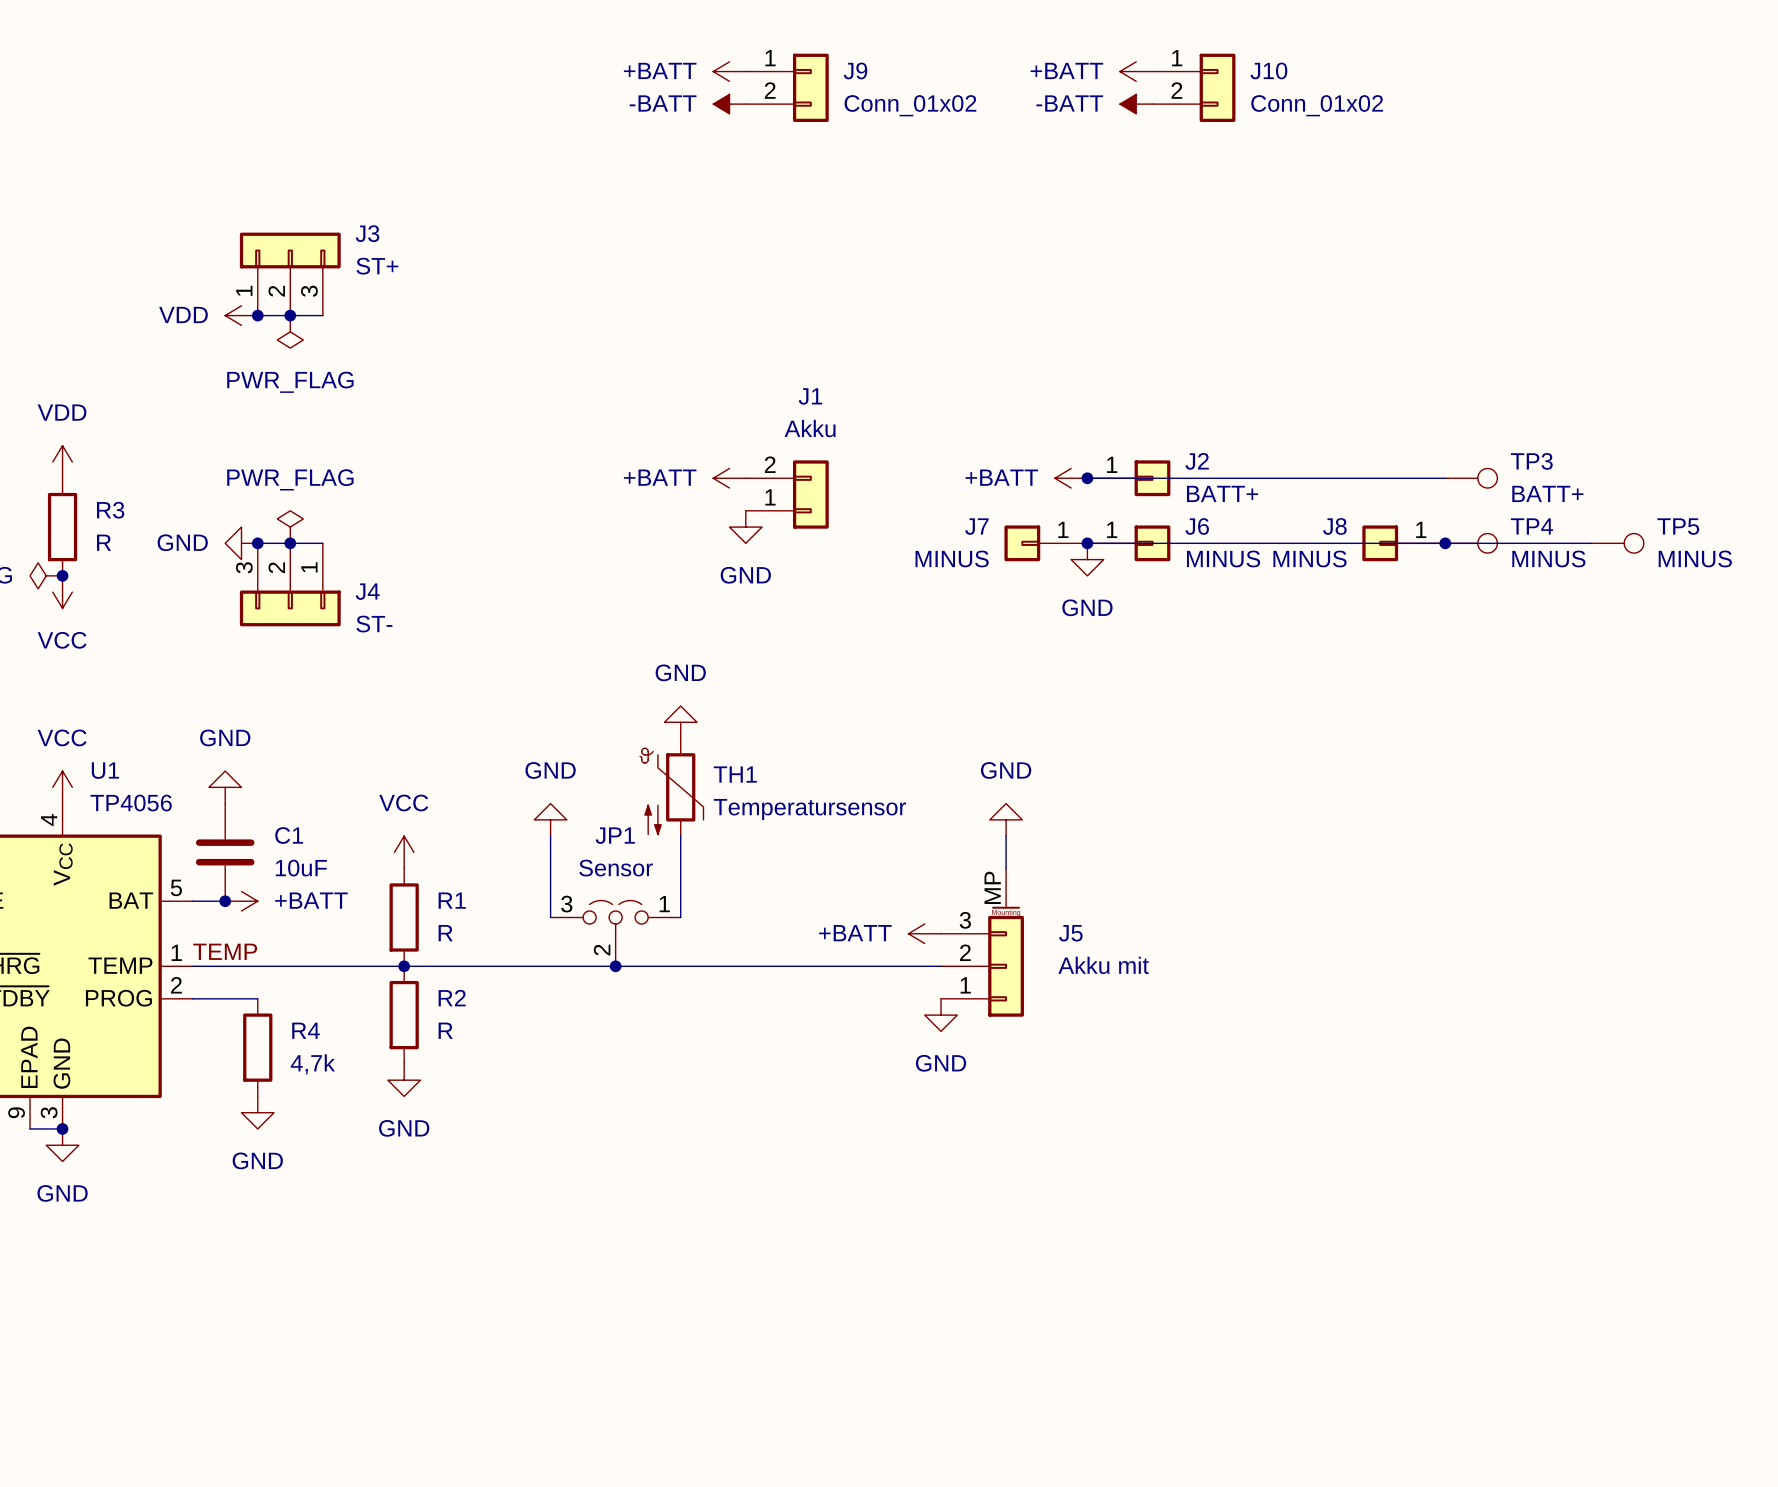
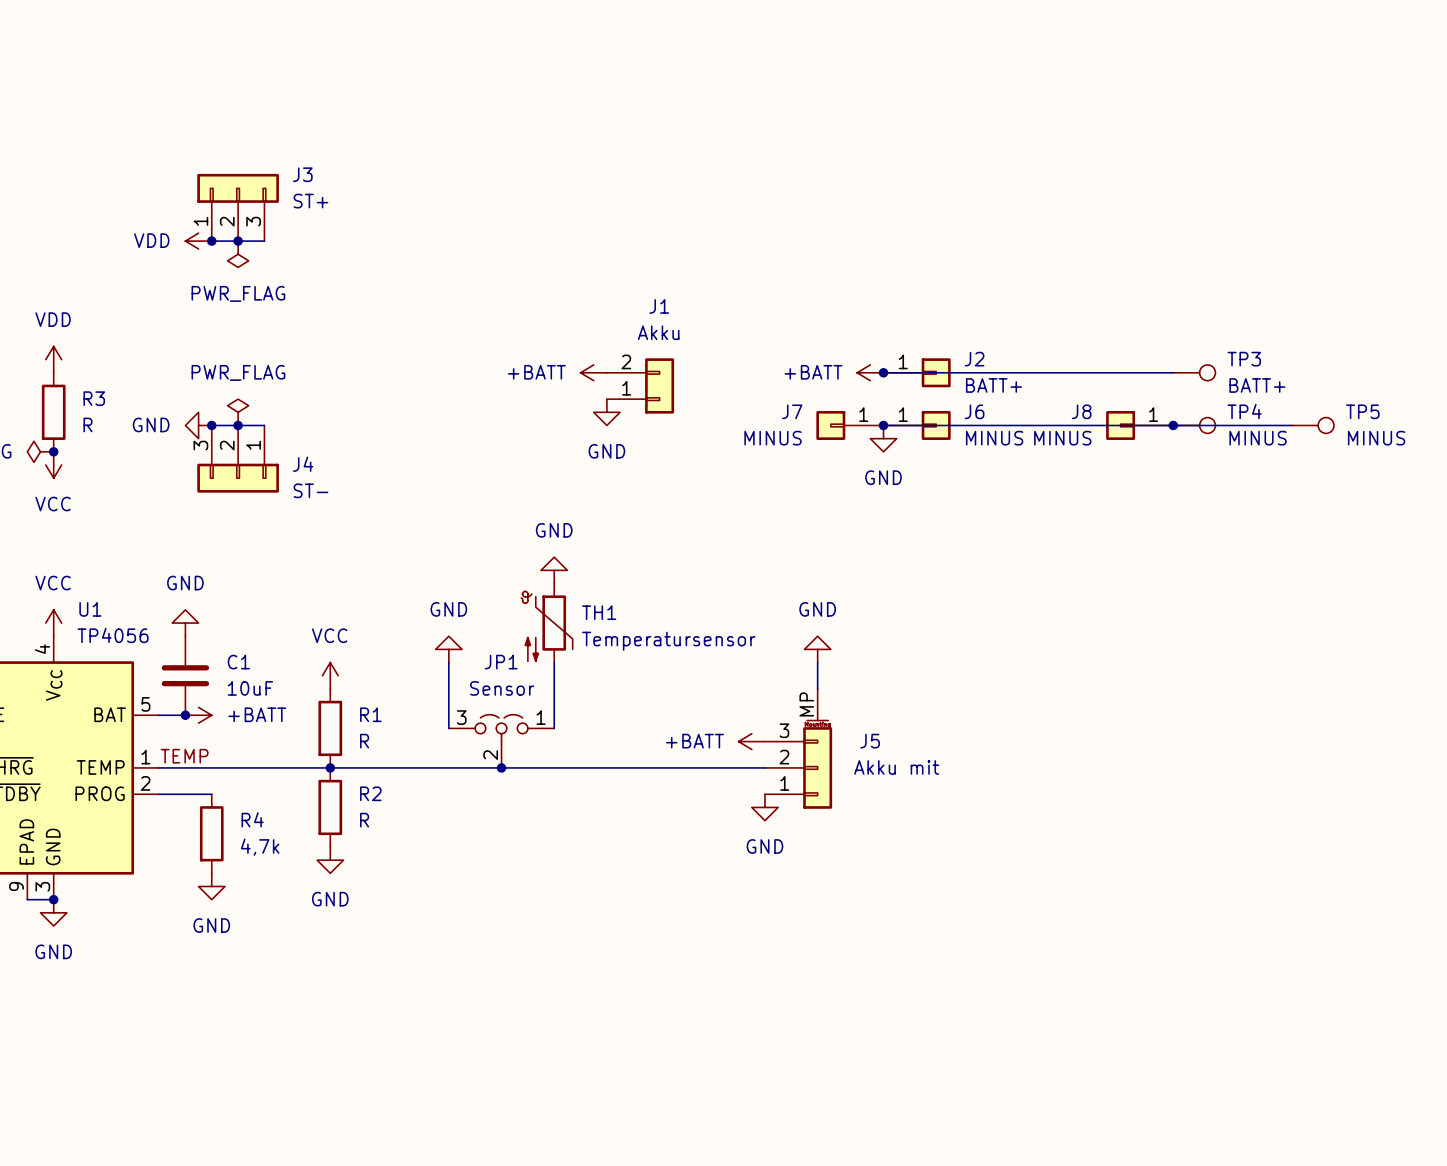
power symbol: +BATT (729, 71) -> none
power symbol: +BATT (1136, 71) -> none
J9: Conn_01x02 (787, 87) -> none
J10: Conn_01x02 (1193, 87) -> none
power symbol: -BATT (729, 104) -> none
power symbol: -BATT (1136, 104) -> none

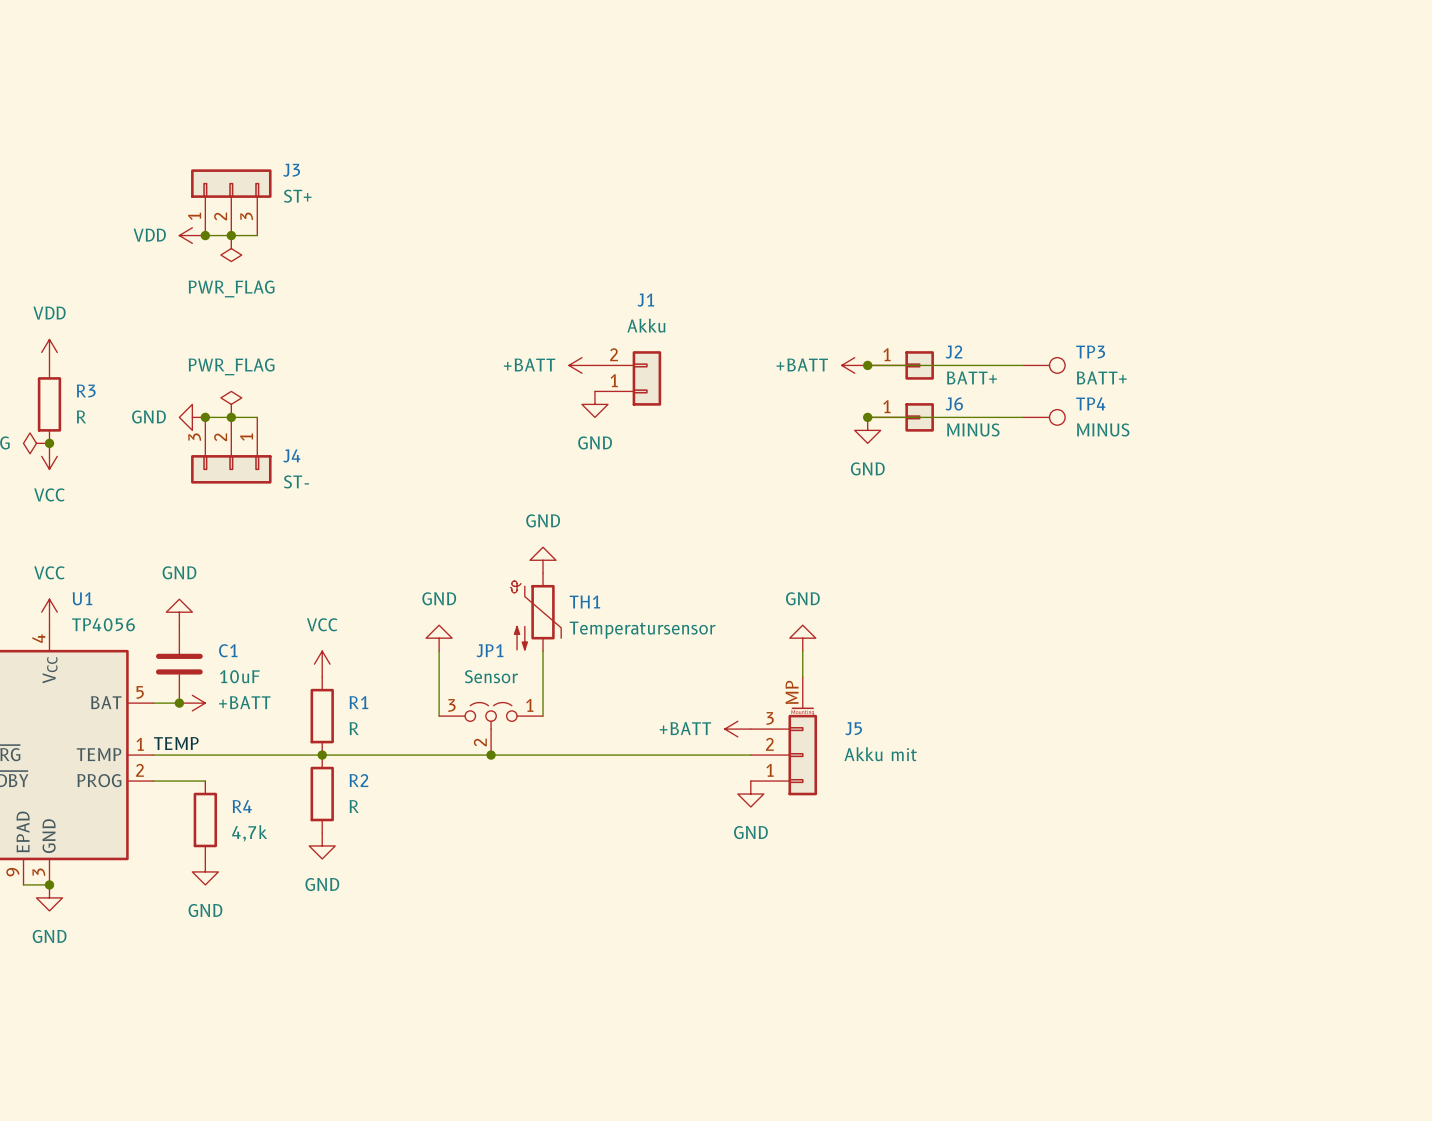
wire: (1041, 372) (1173, 372) -> none
TP3 position: (1194, 372) -> (1044, 365)
J7: MINUS (849, 425) -> none
wire: (1041, 425) (1291, 425) -> none
J8: MINUS (1139, 425) -> none
junction: (1173, 425) -> none
TP4 position: (1194, 425) -> (1044, 417)
TP5: MINUS (1312, 425) -> none

